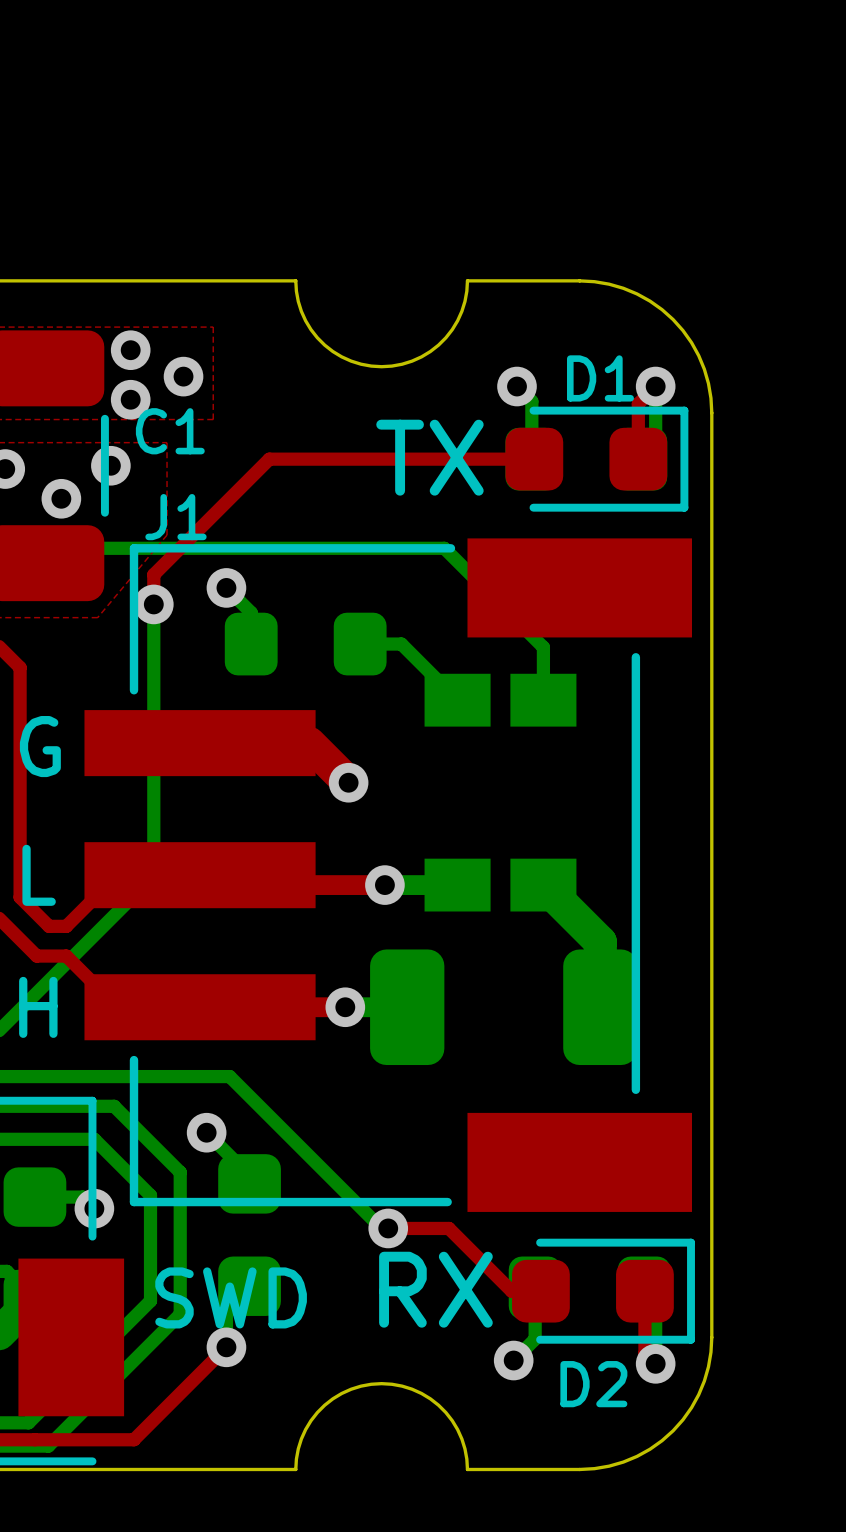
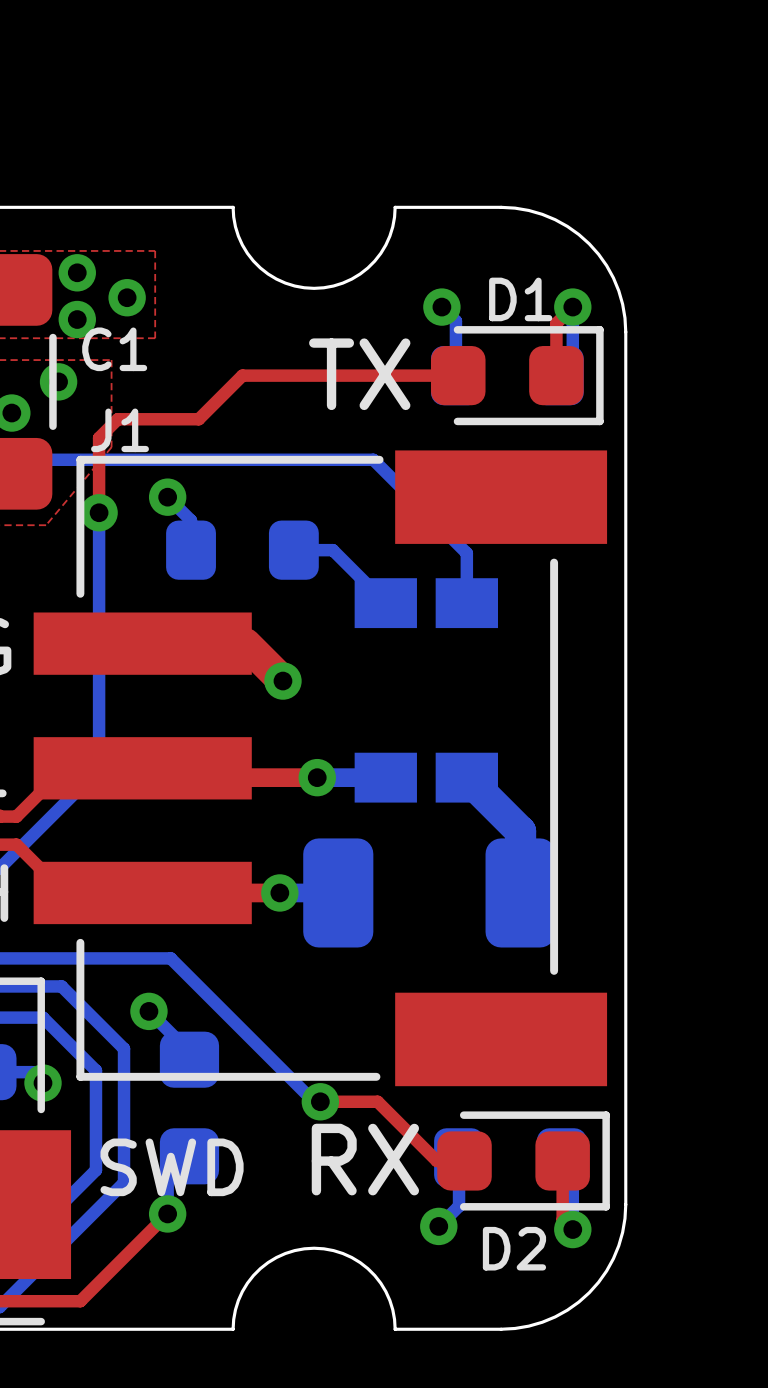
top track: (305, 459) (269, 459) (153, 574) -> (242, 375) (198, 419) (117, 419) (99, 437) (99, 484)

